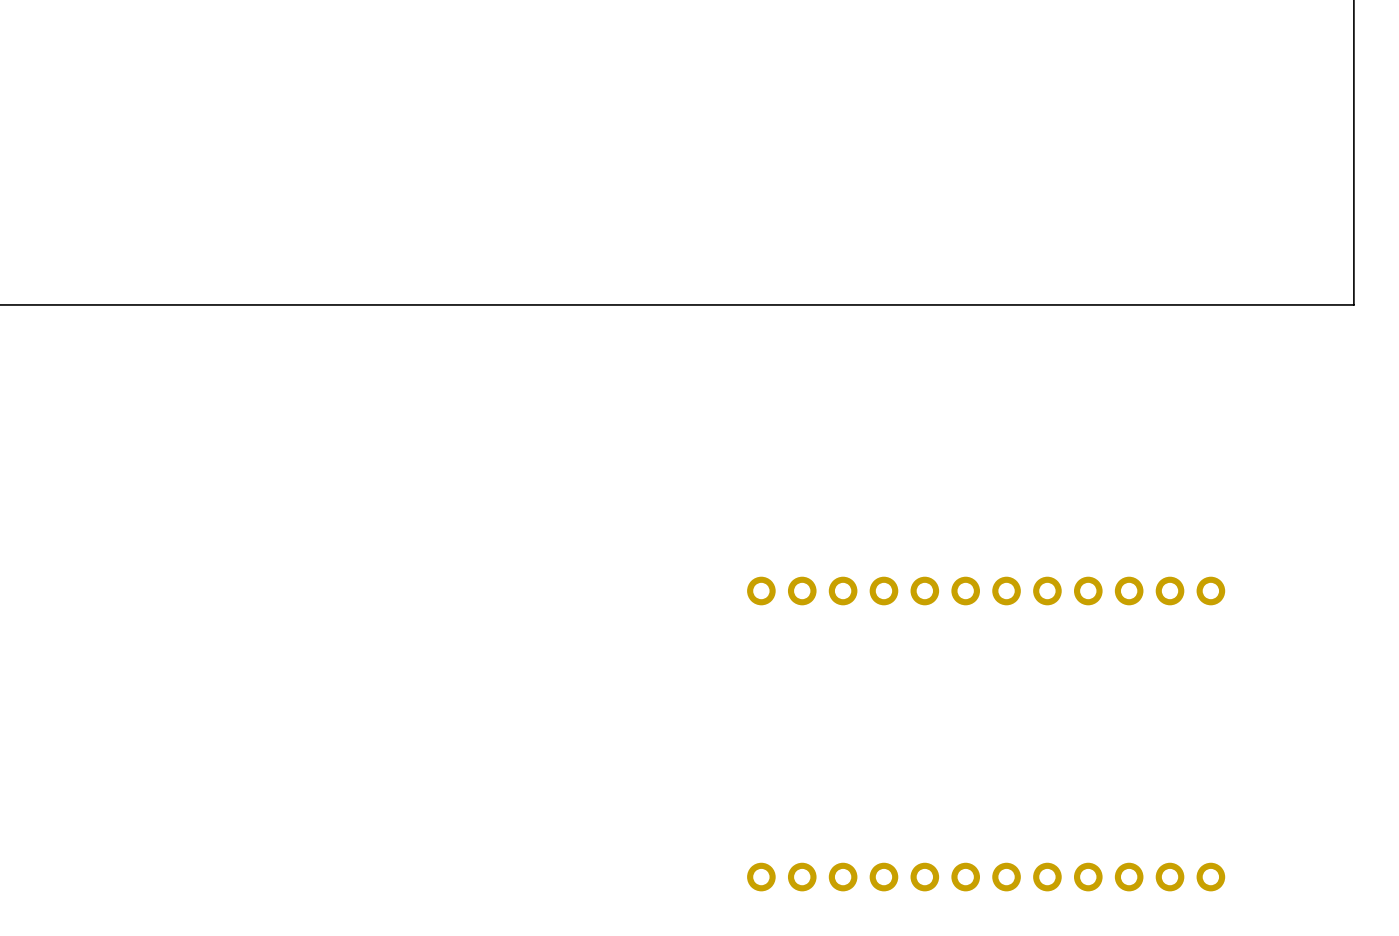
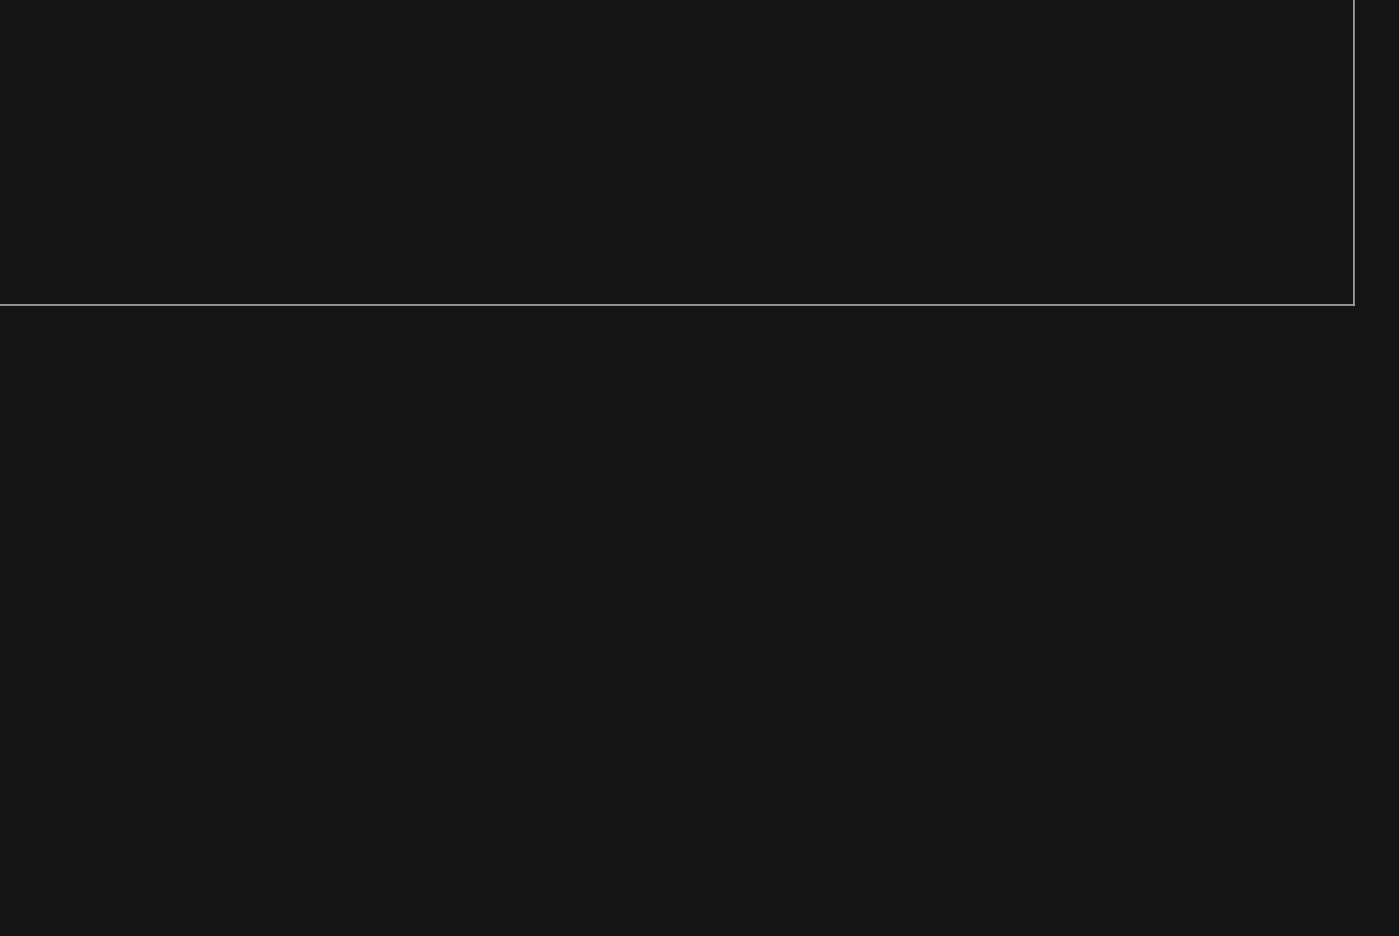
part: (986, 591) -> none
part: (986, 877) -> none

